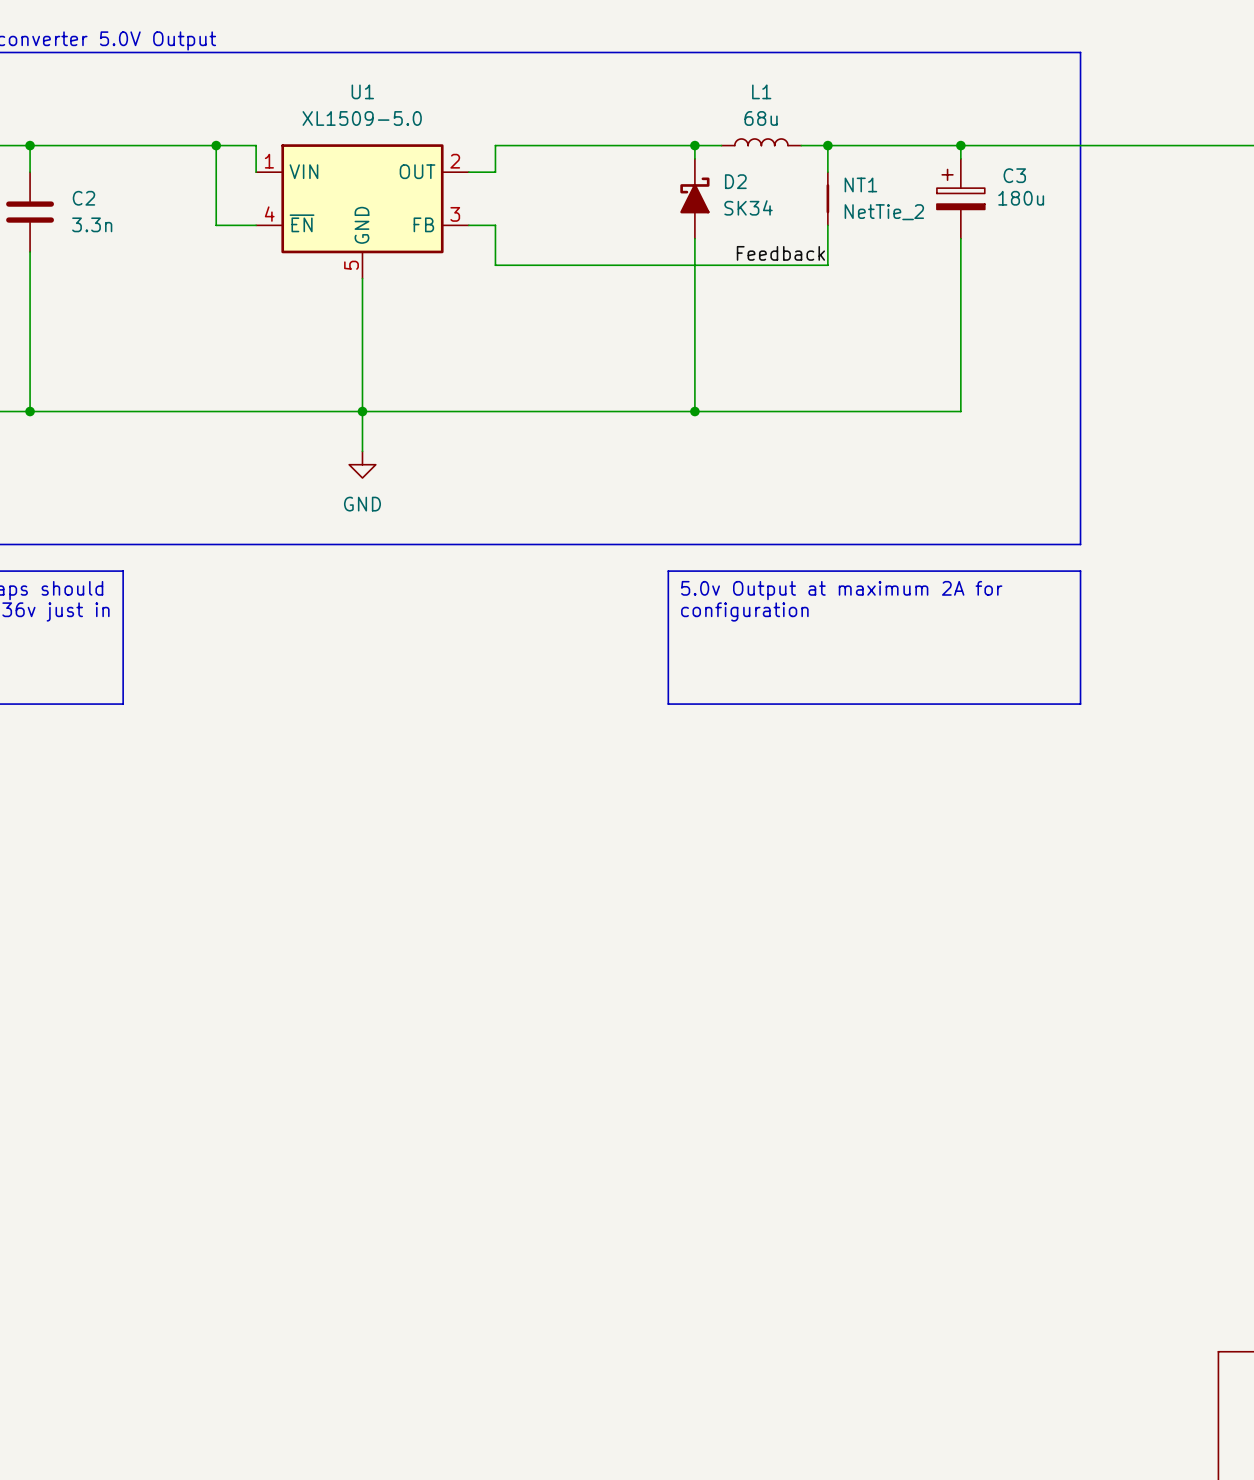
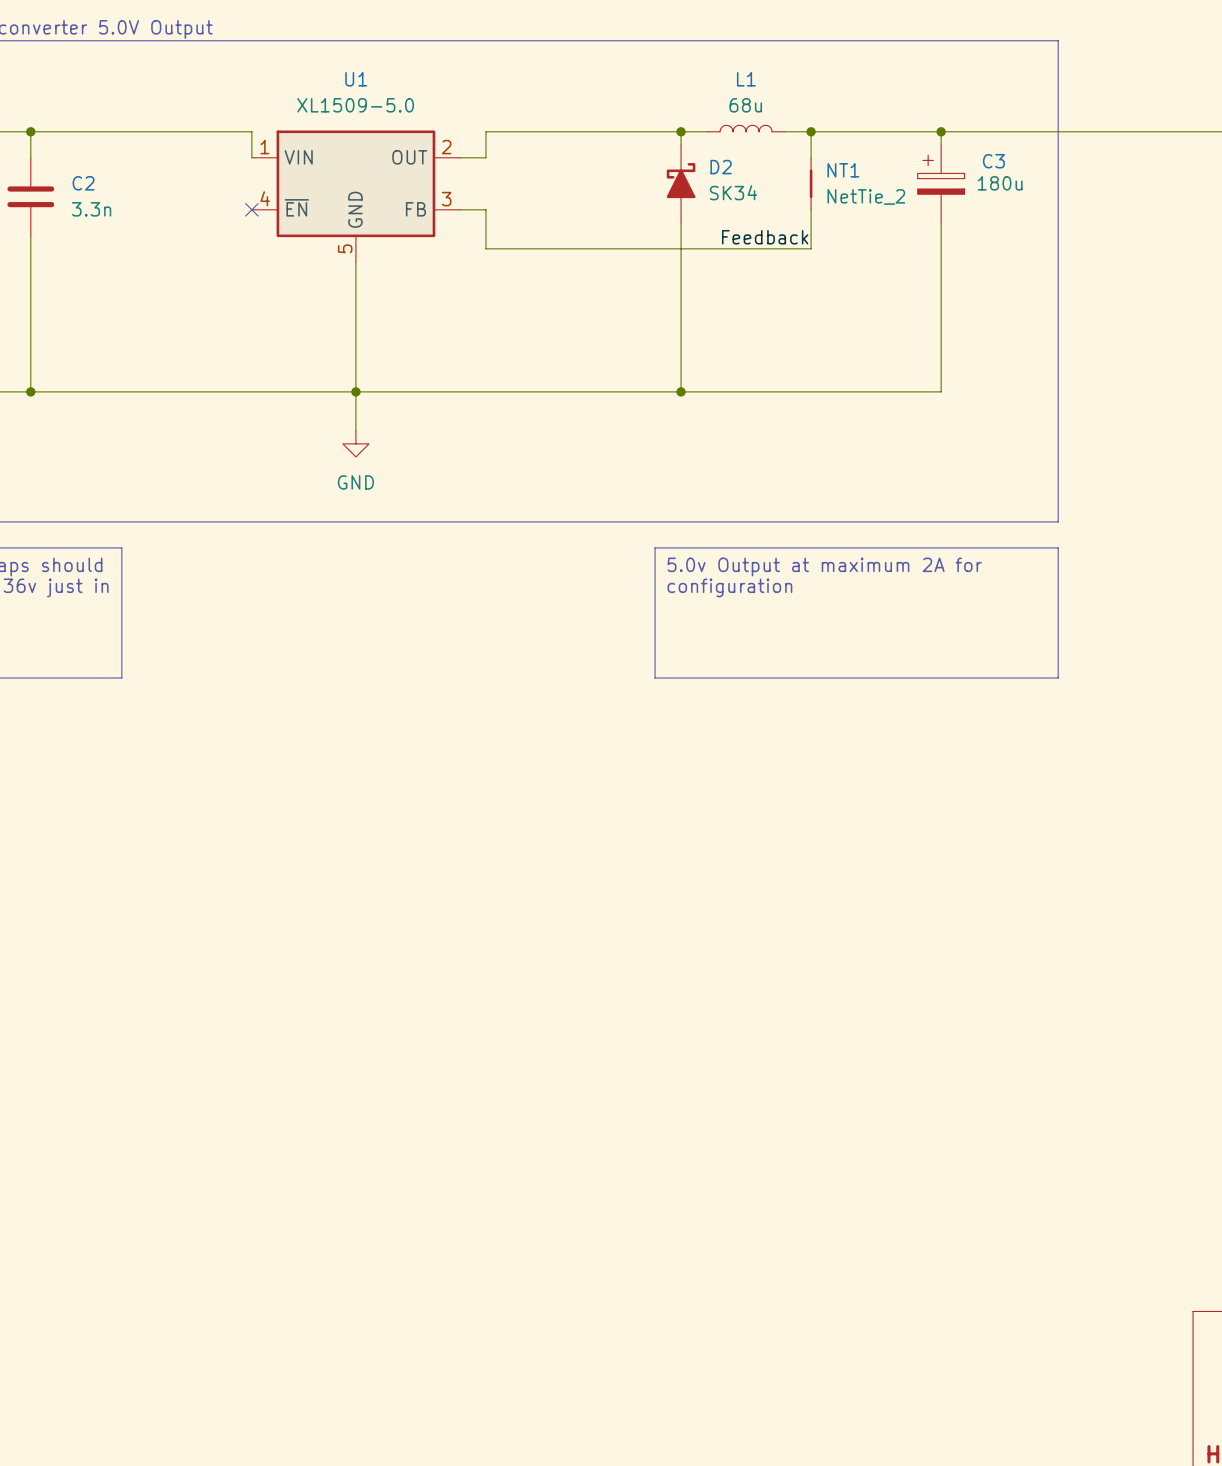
wire: (216, 145) (216, 225) (256, 225) -> none
junction: (216, 145) -> none
no-connect mark: none -> (251, 209)

